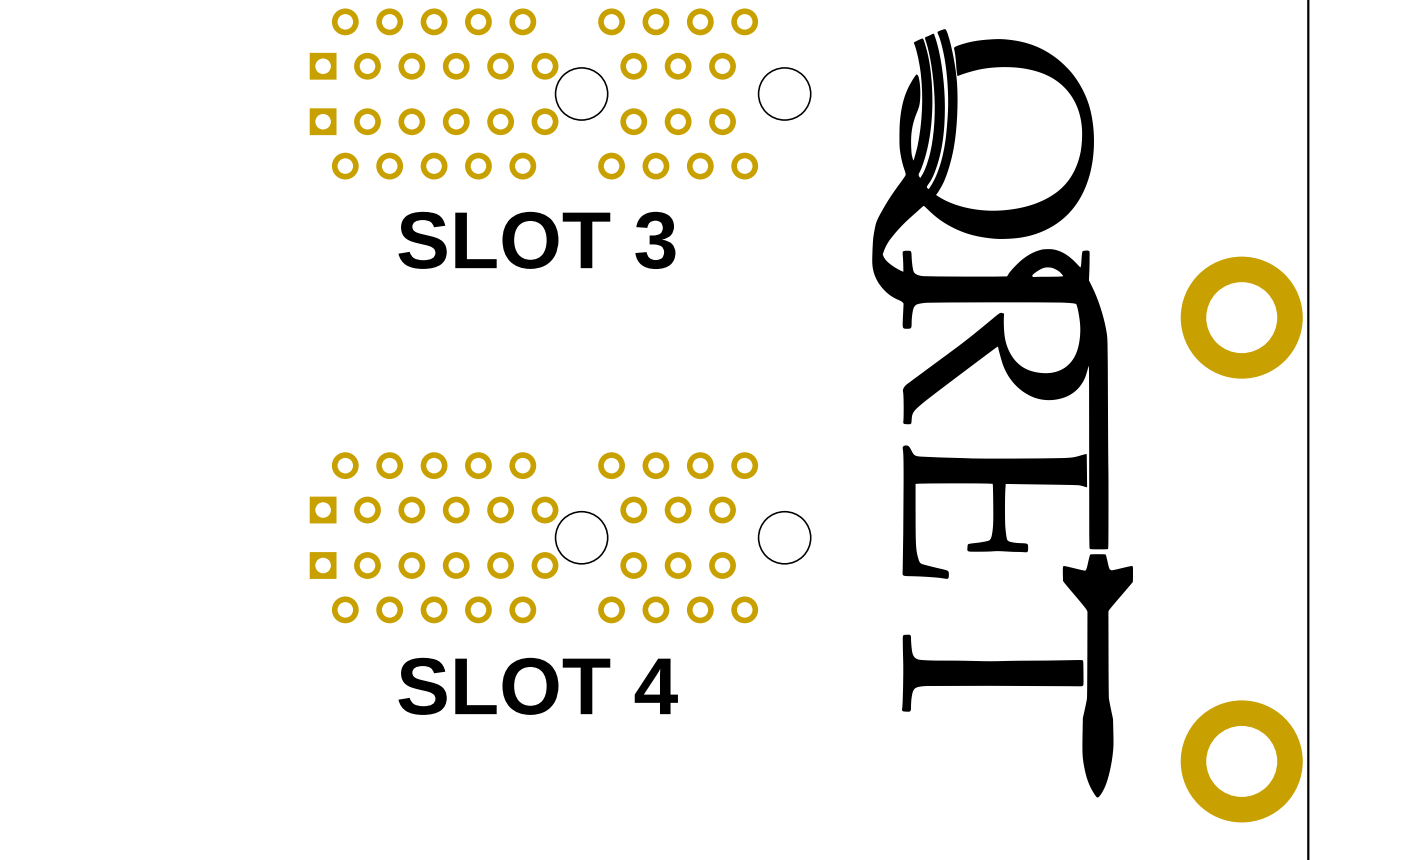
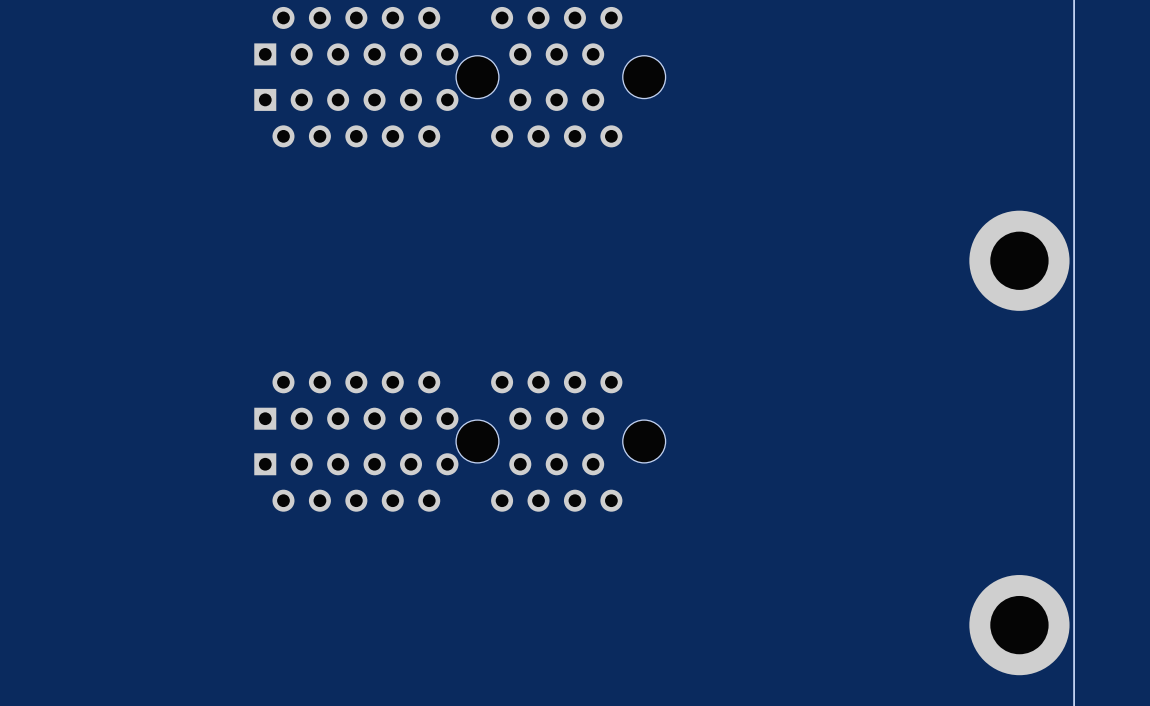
drawing: [872, 29, 1134, 798] -> none
text: SLOT 3 (536, 240) -> none
text: SLOT 4 (538, 686) -> none

